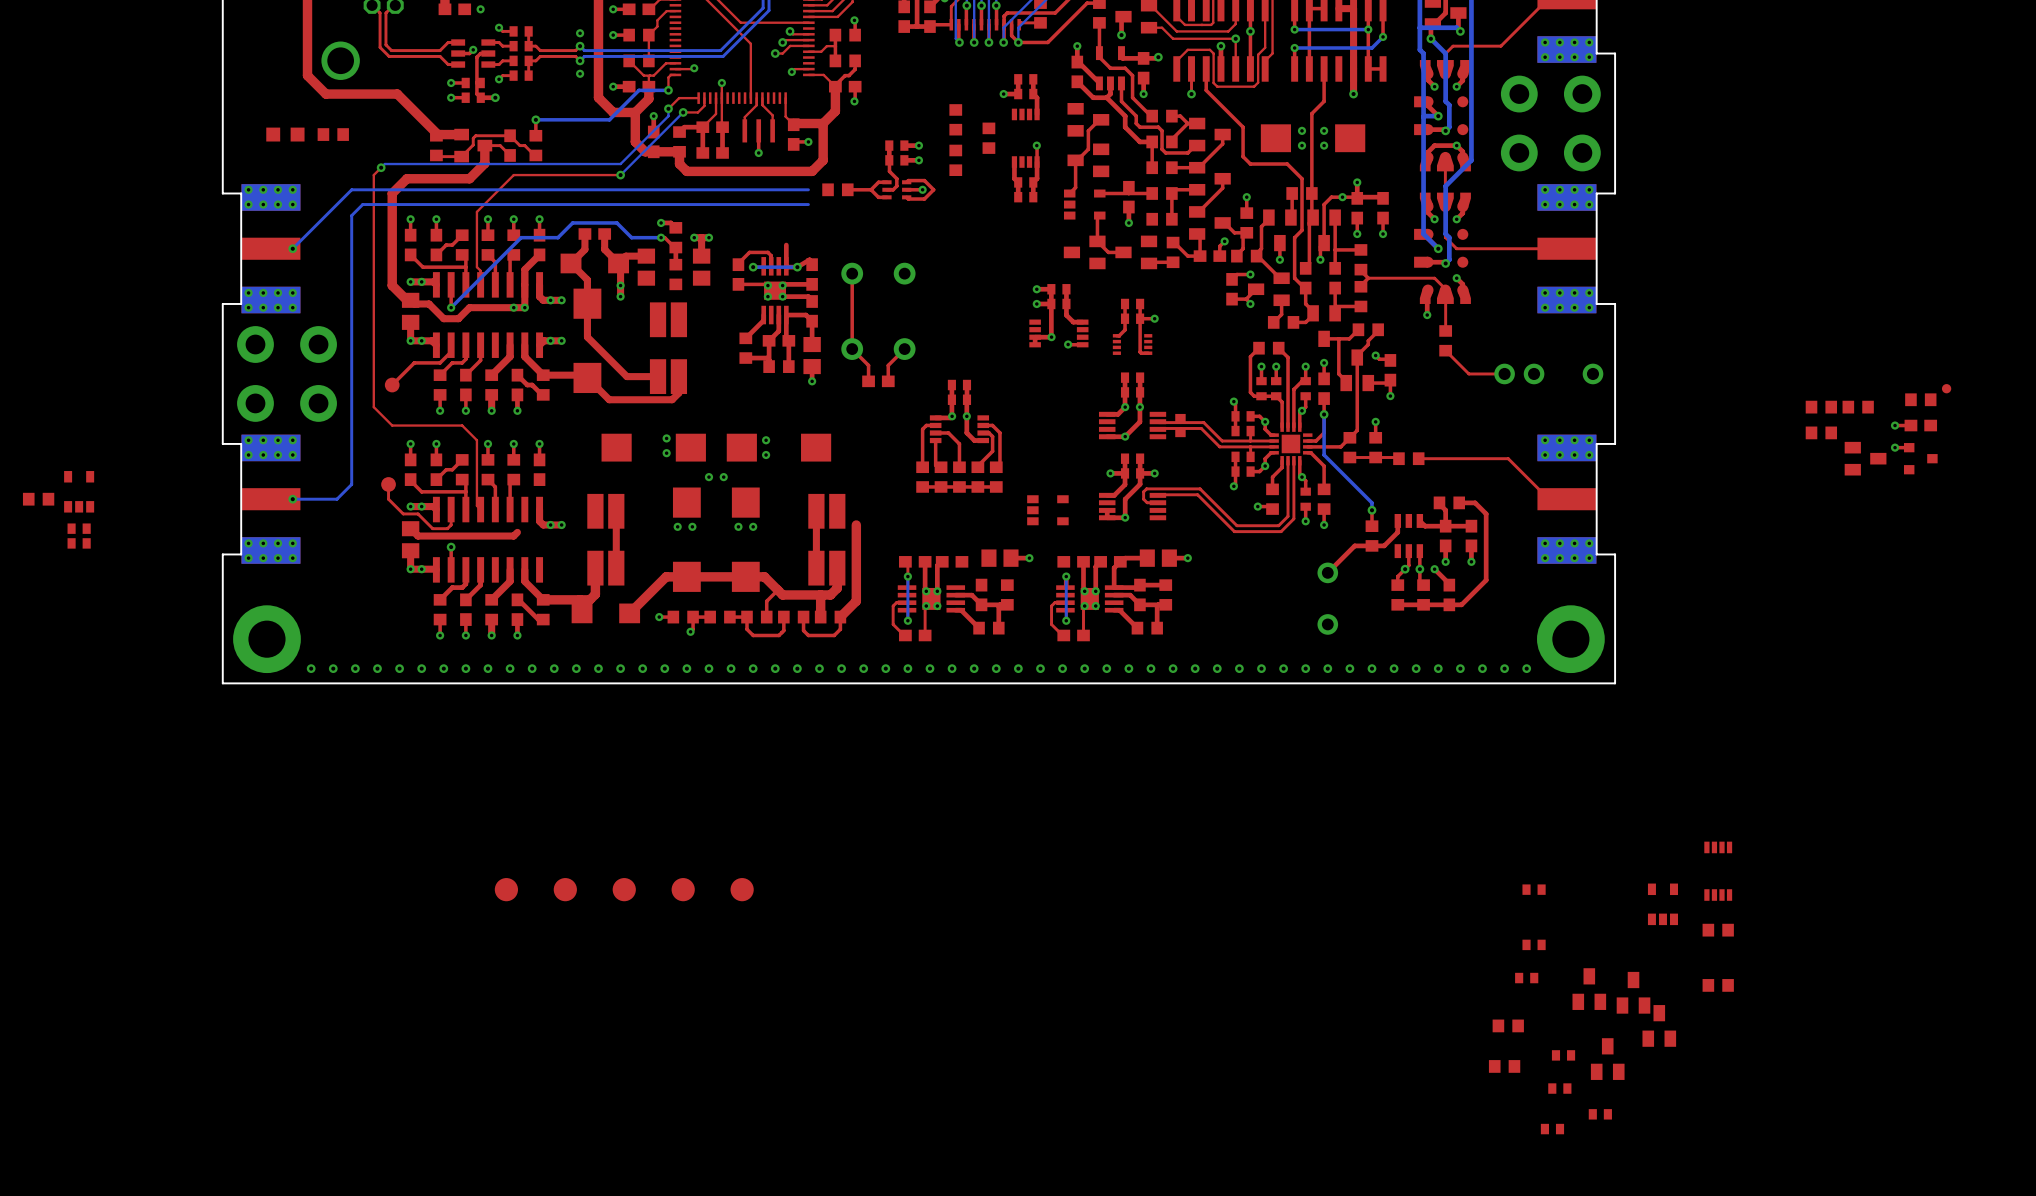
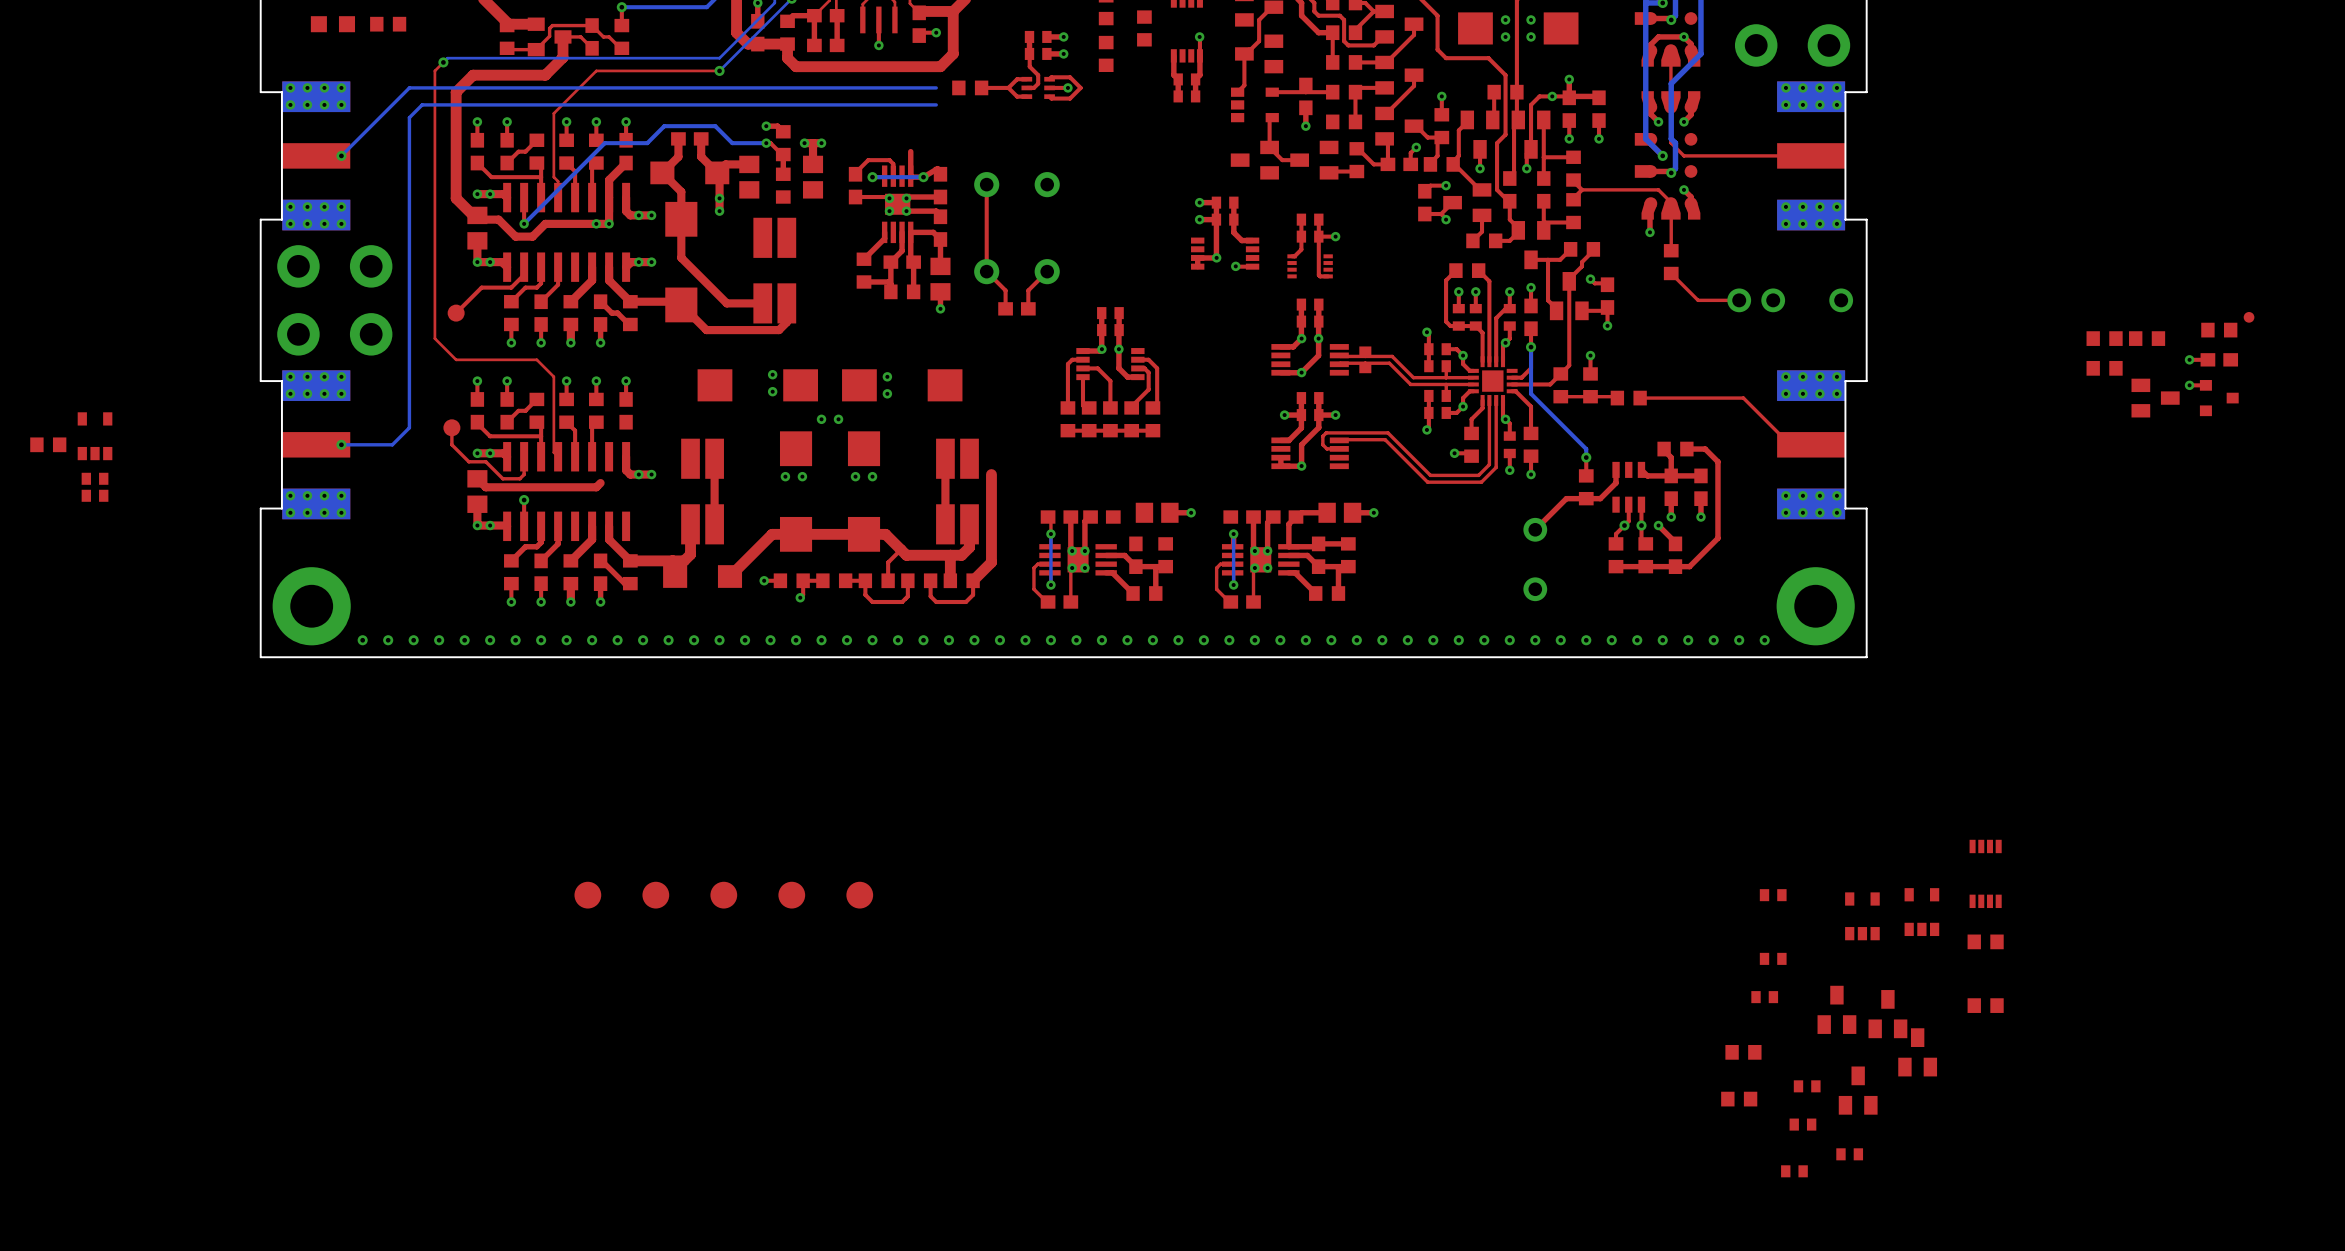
part: (1047, 510) -> none
part: none -> (1862, 916)

